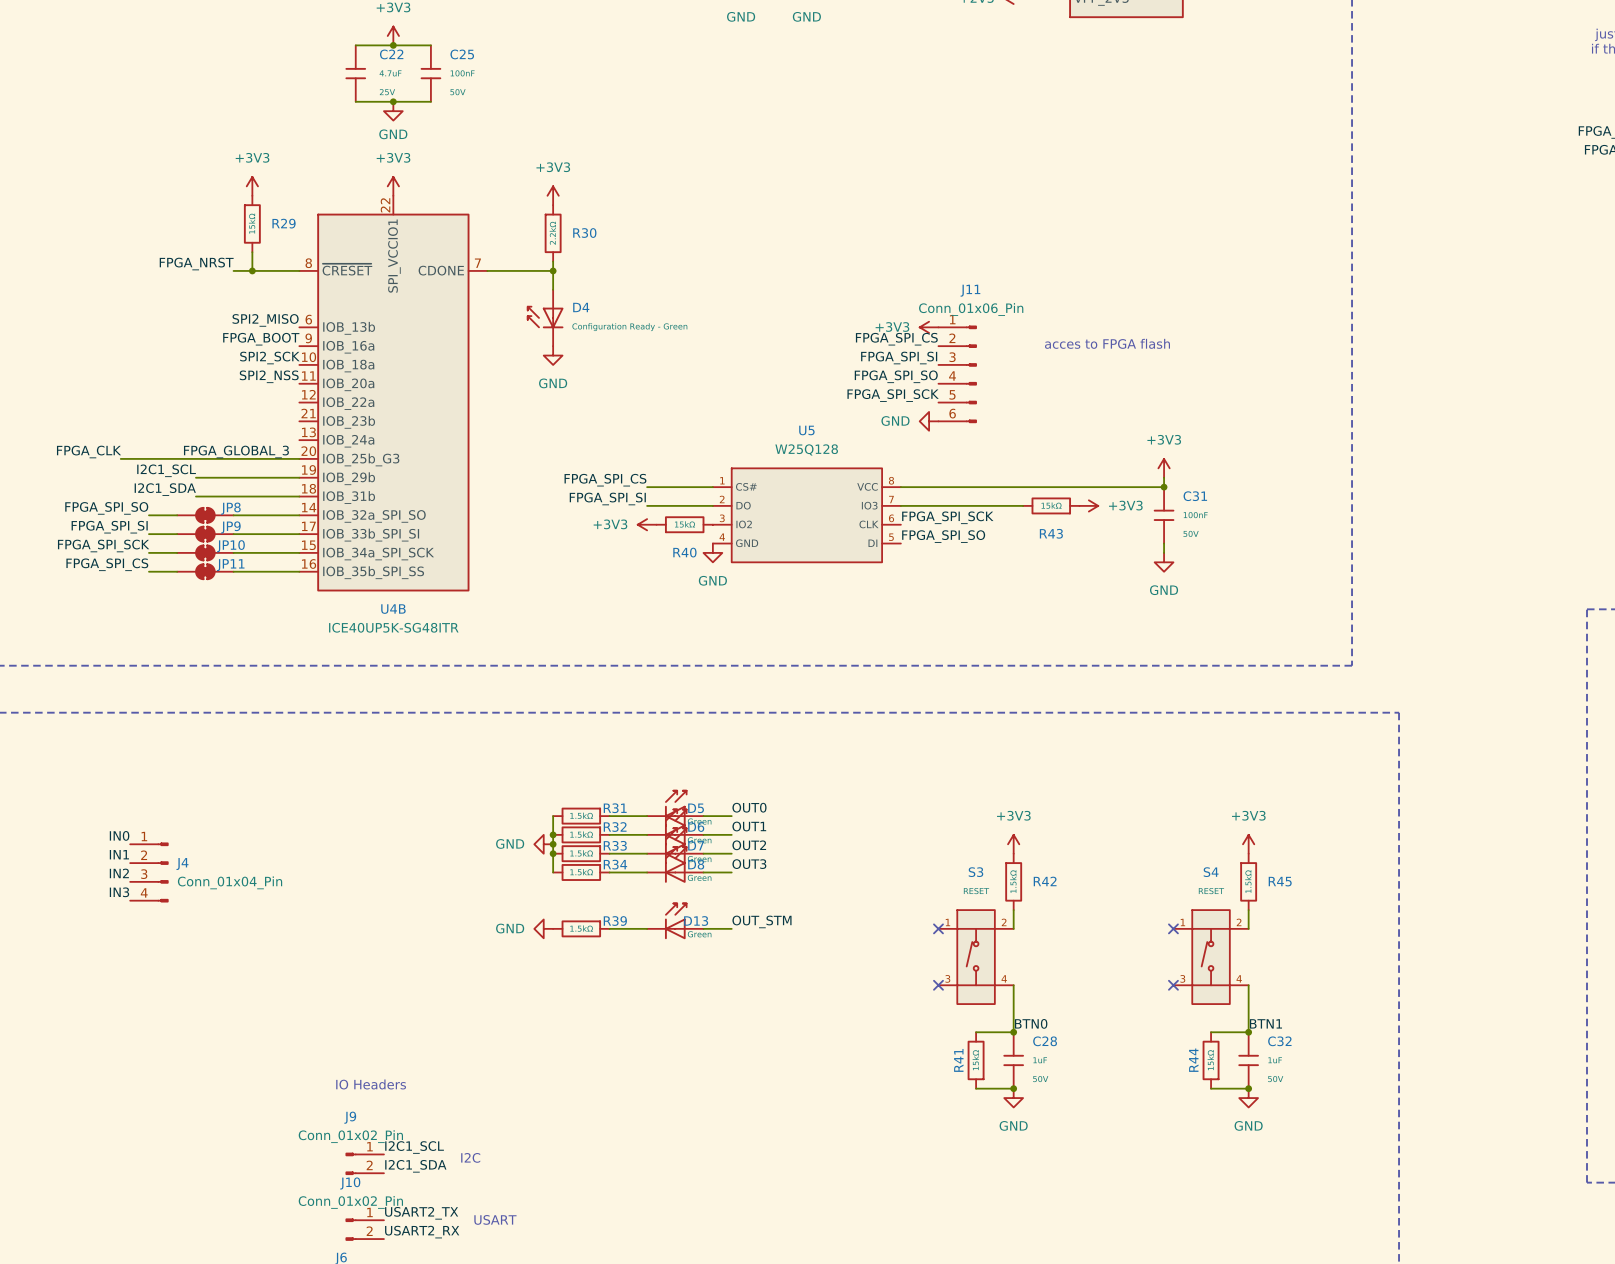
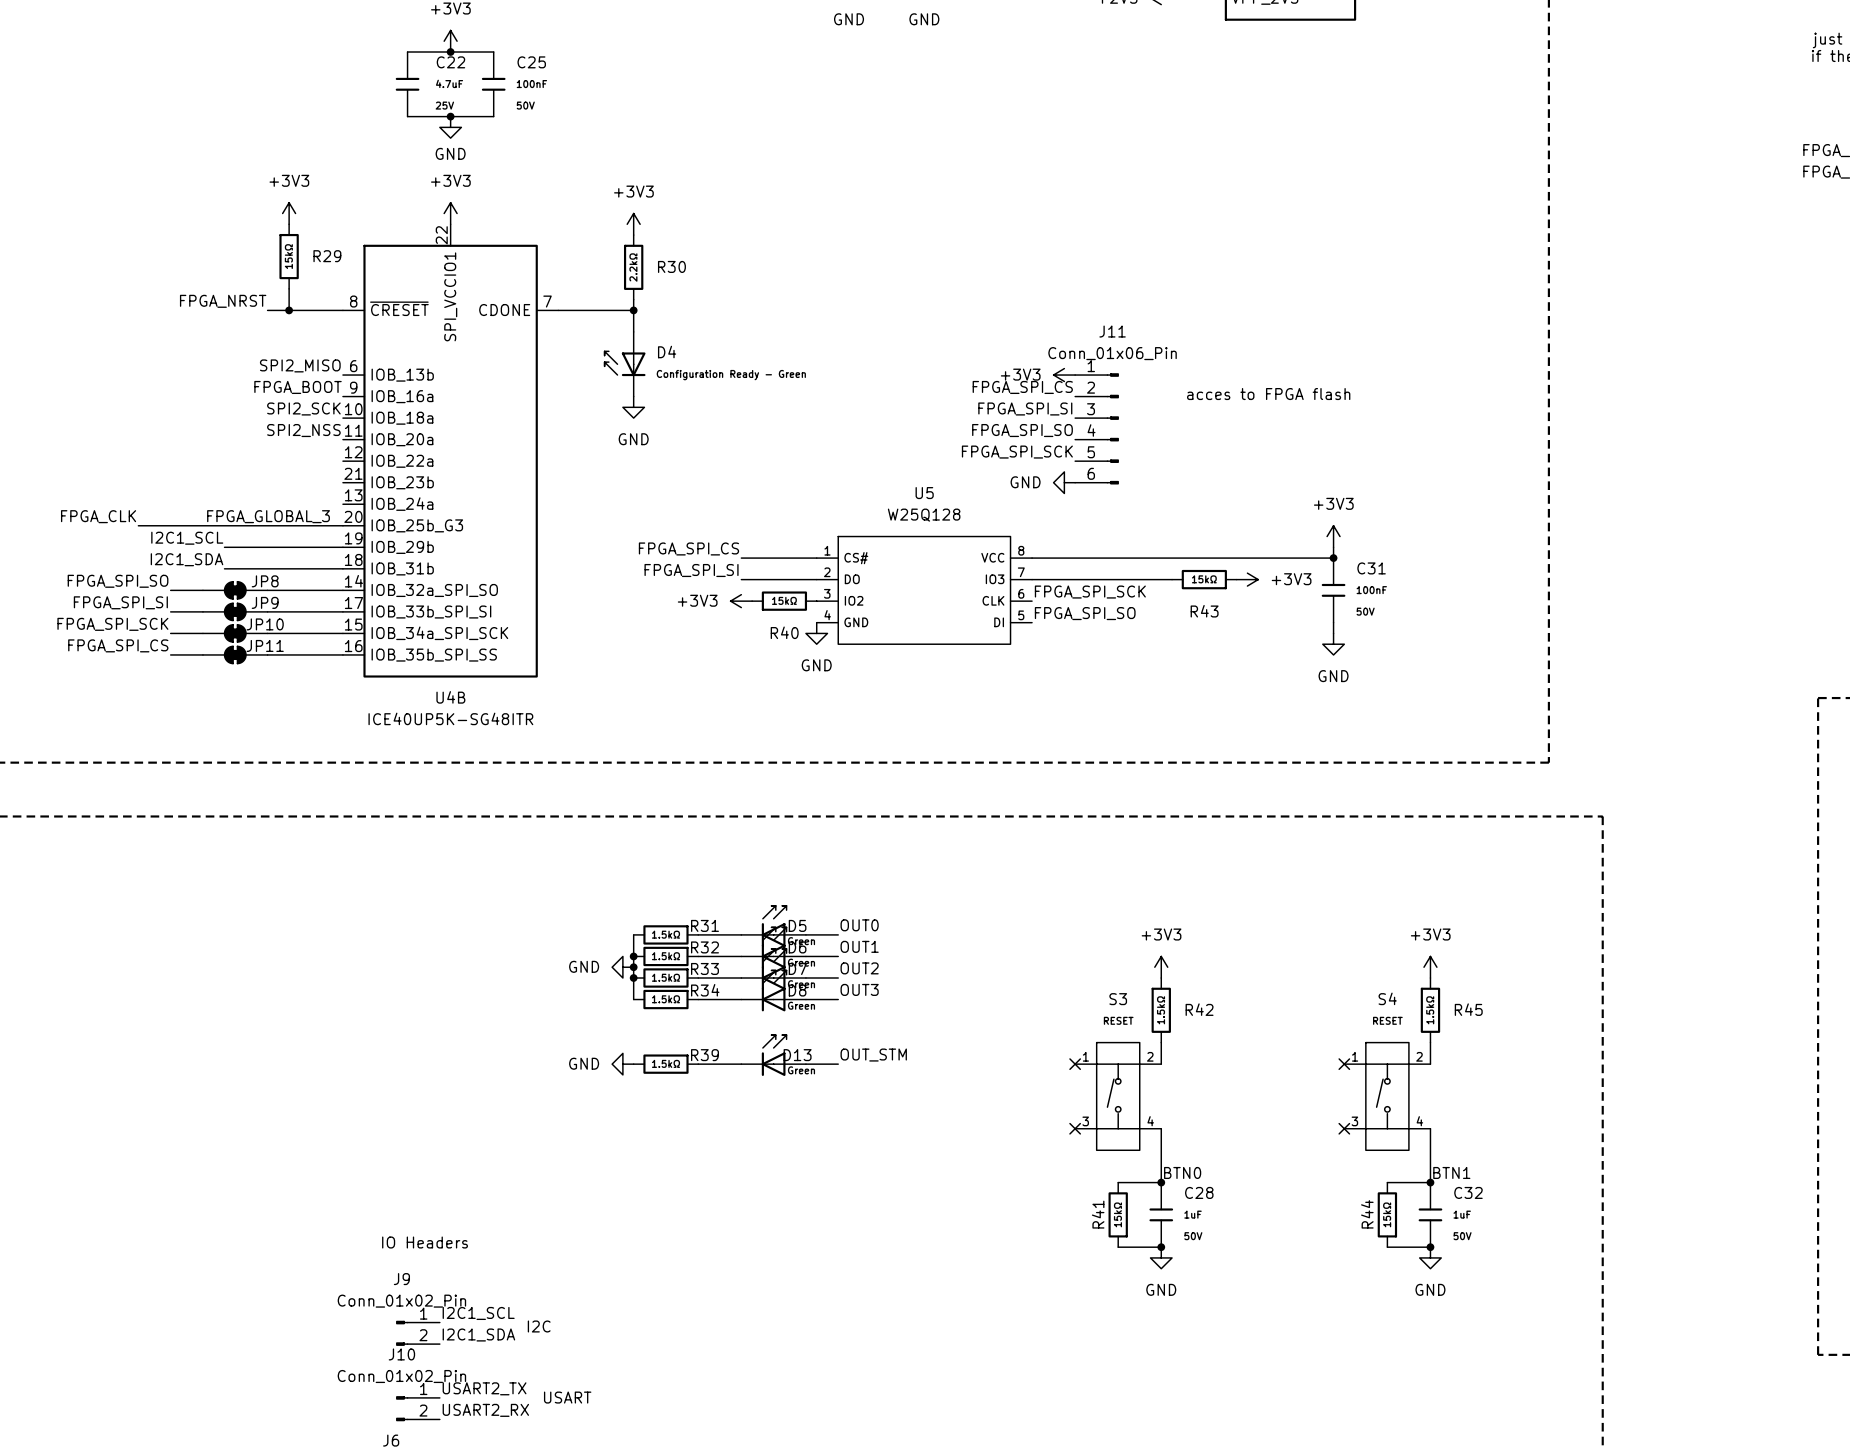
label: IN0 (119, 835) -> none
label: IN1 (119, 854) -> none
J4: Conn_01x04_Pin (149, 872) -> none
label: IN2 (119, 873) -> none
label: IN3 (119, 892) -> none

